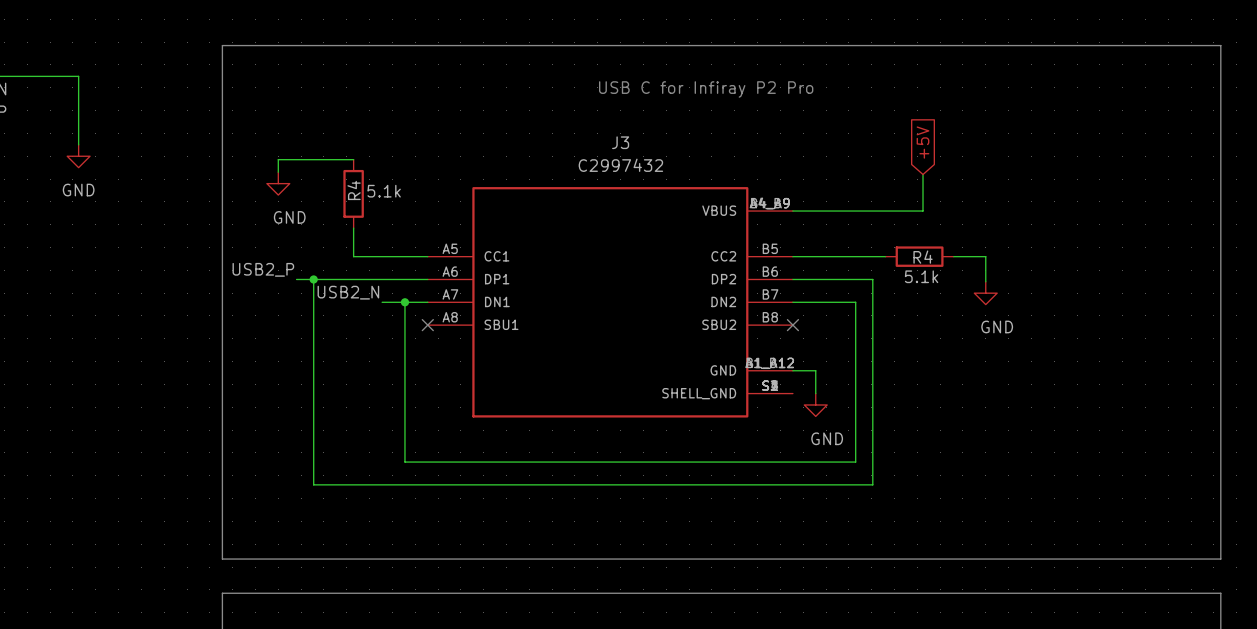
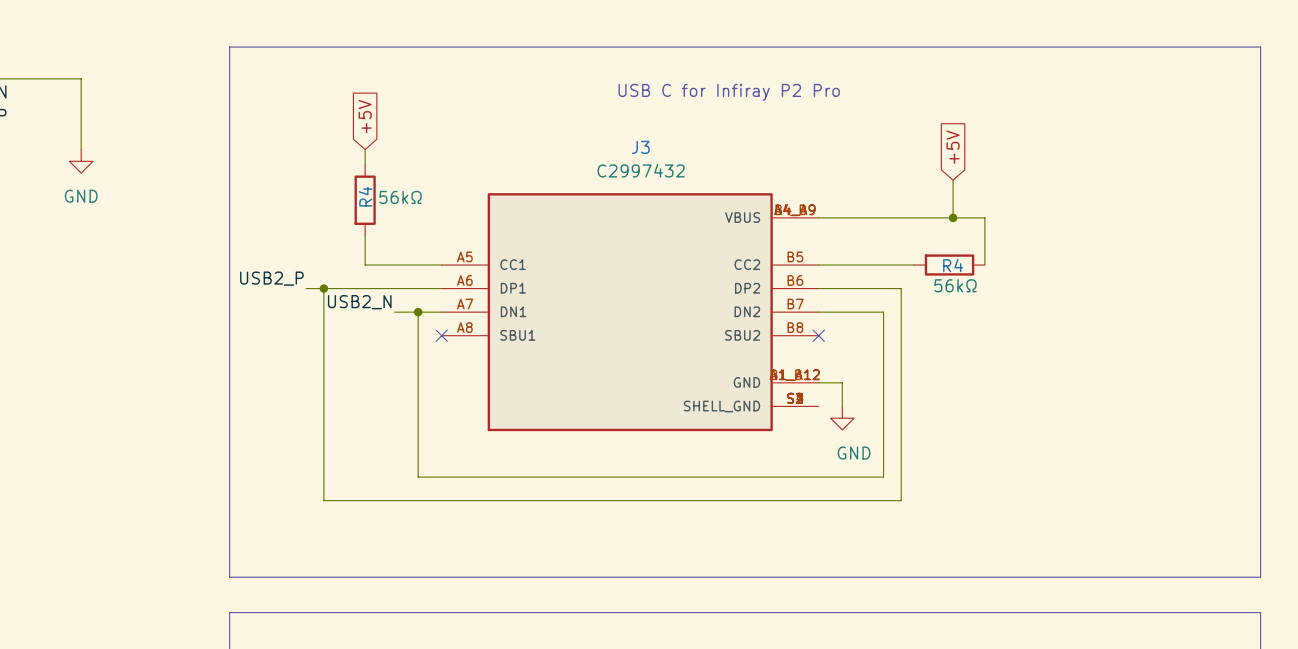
global label: none -> +5V (365, 116)
wire: (353, 159) (278, 159) (278, 172) -> (365, 164) (365, 149)
power symbol: GND (278, 183) -> none
R4 value: 5.1k (384, 191) -> 56kΩ (400, 197)
junction: none -> (953, 217)
wire: (953, 256) (985, 256) (985, 281) -> (984, 265) (984, 217) (953, 217)
R4 value: 5.1k (921, 276) -> 56kΩ (955, 285)
power symbol: GND (985, 293) -> none

